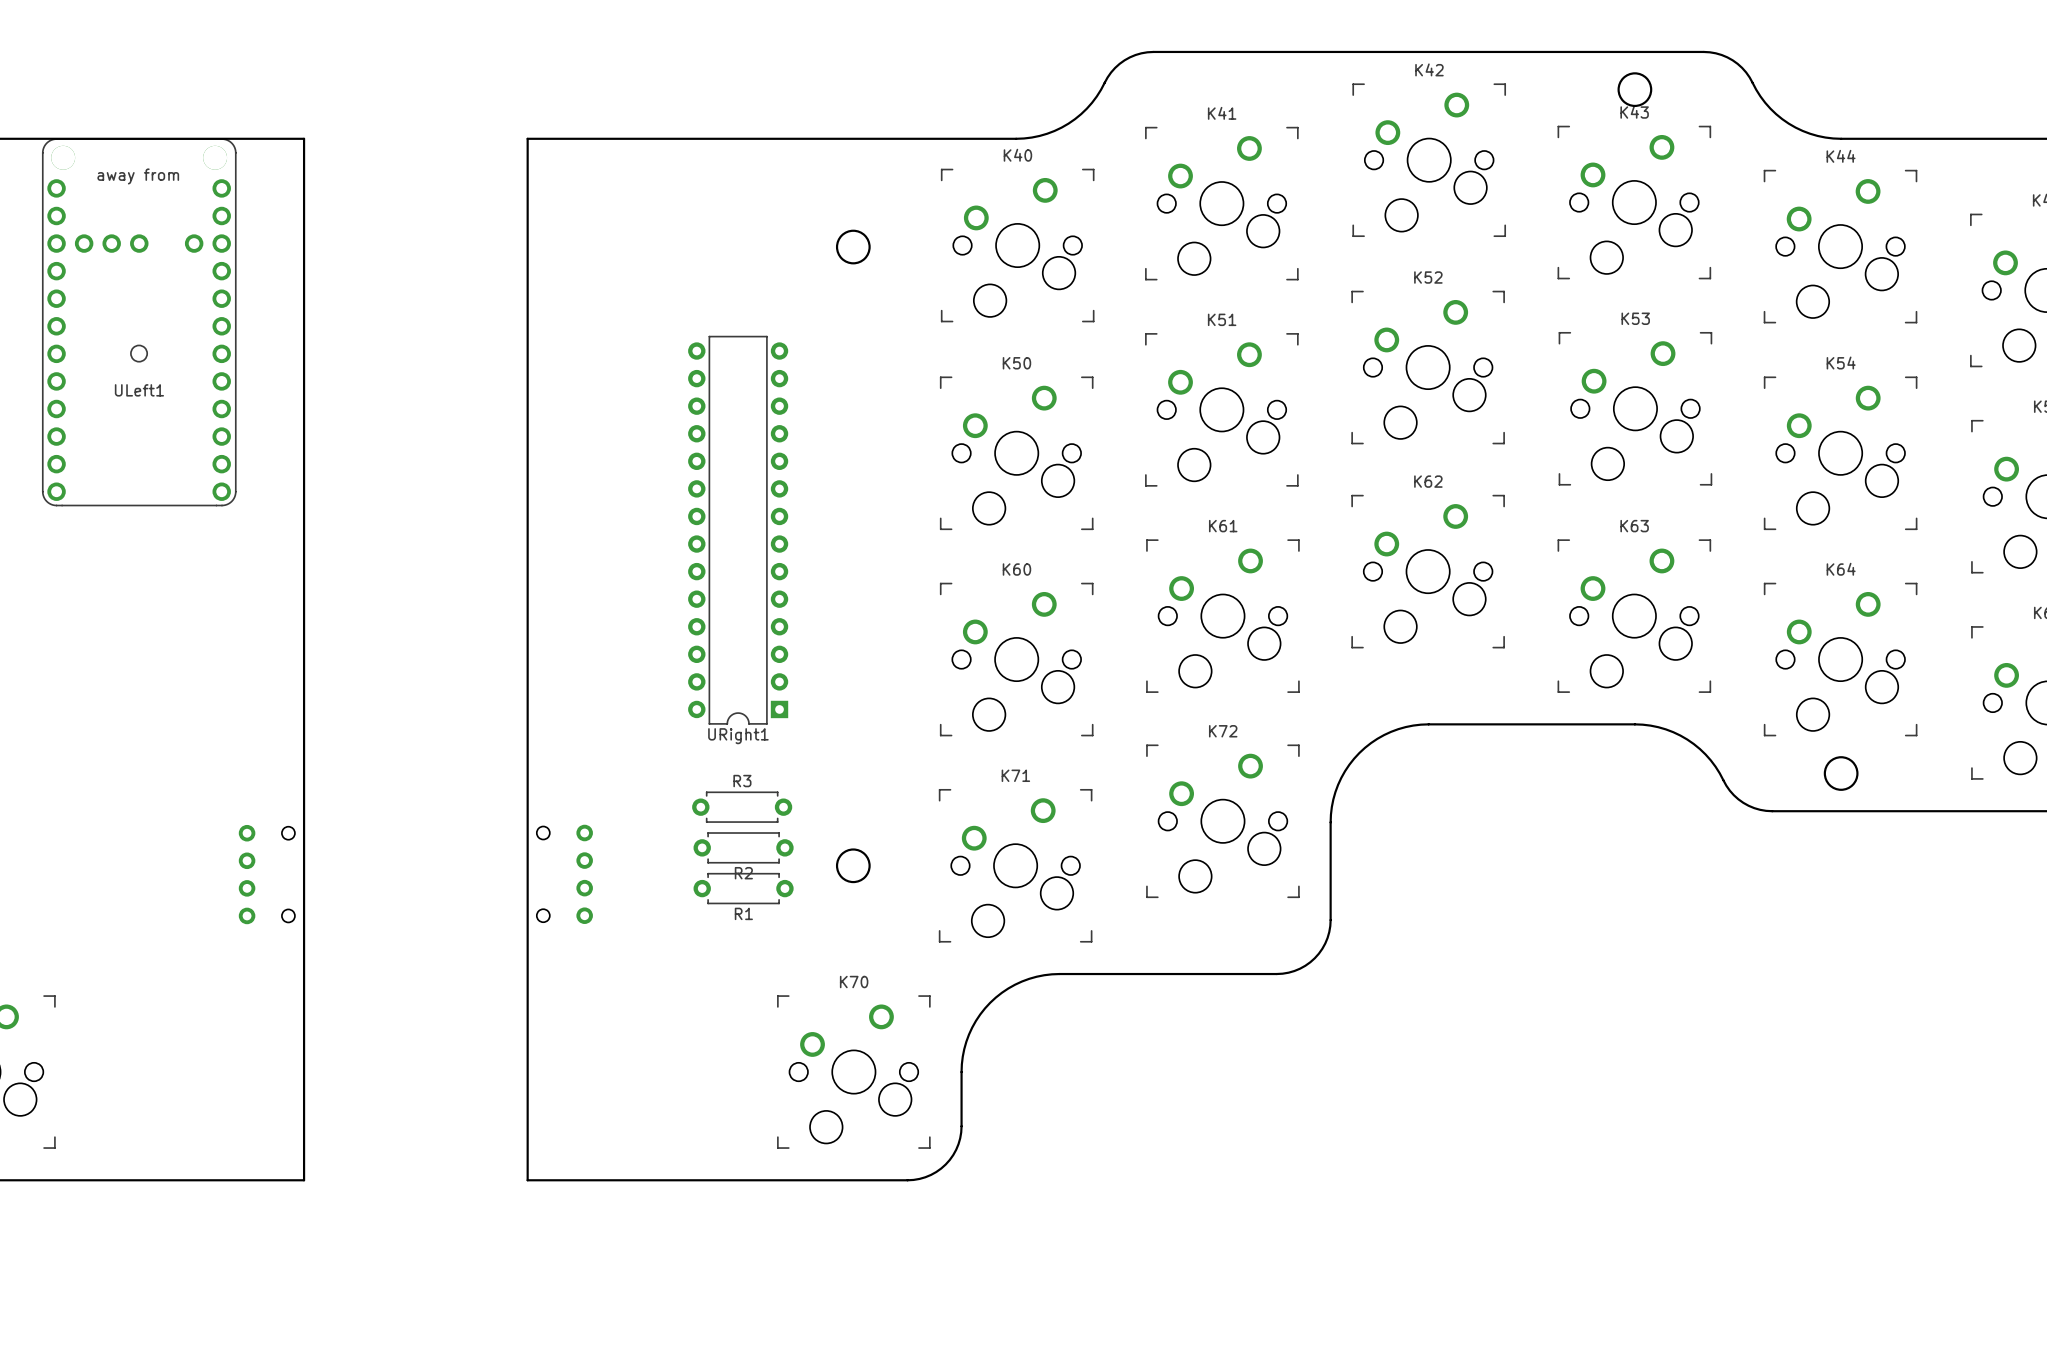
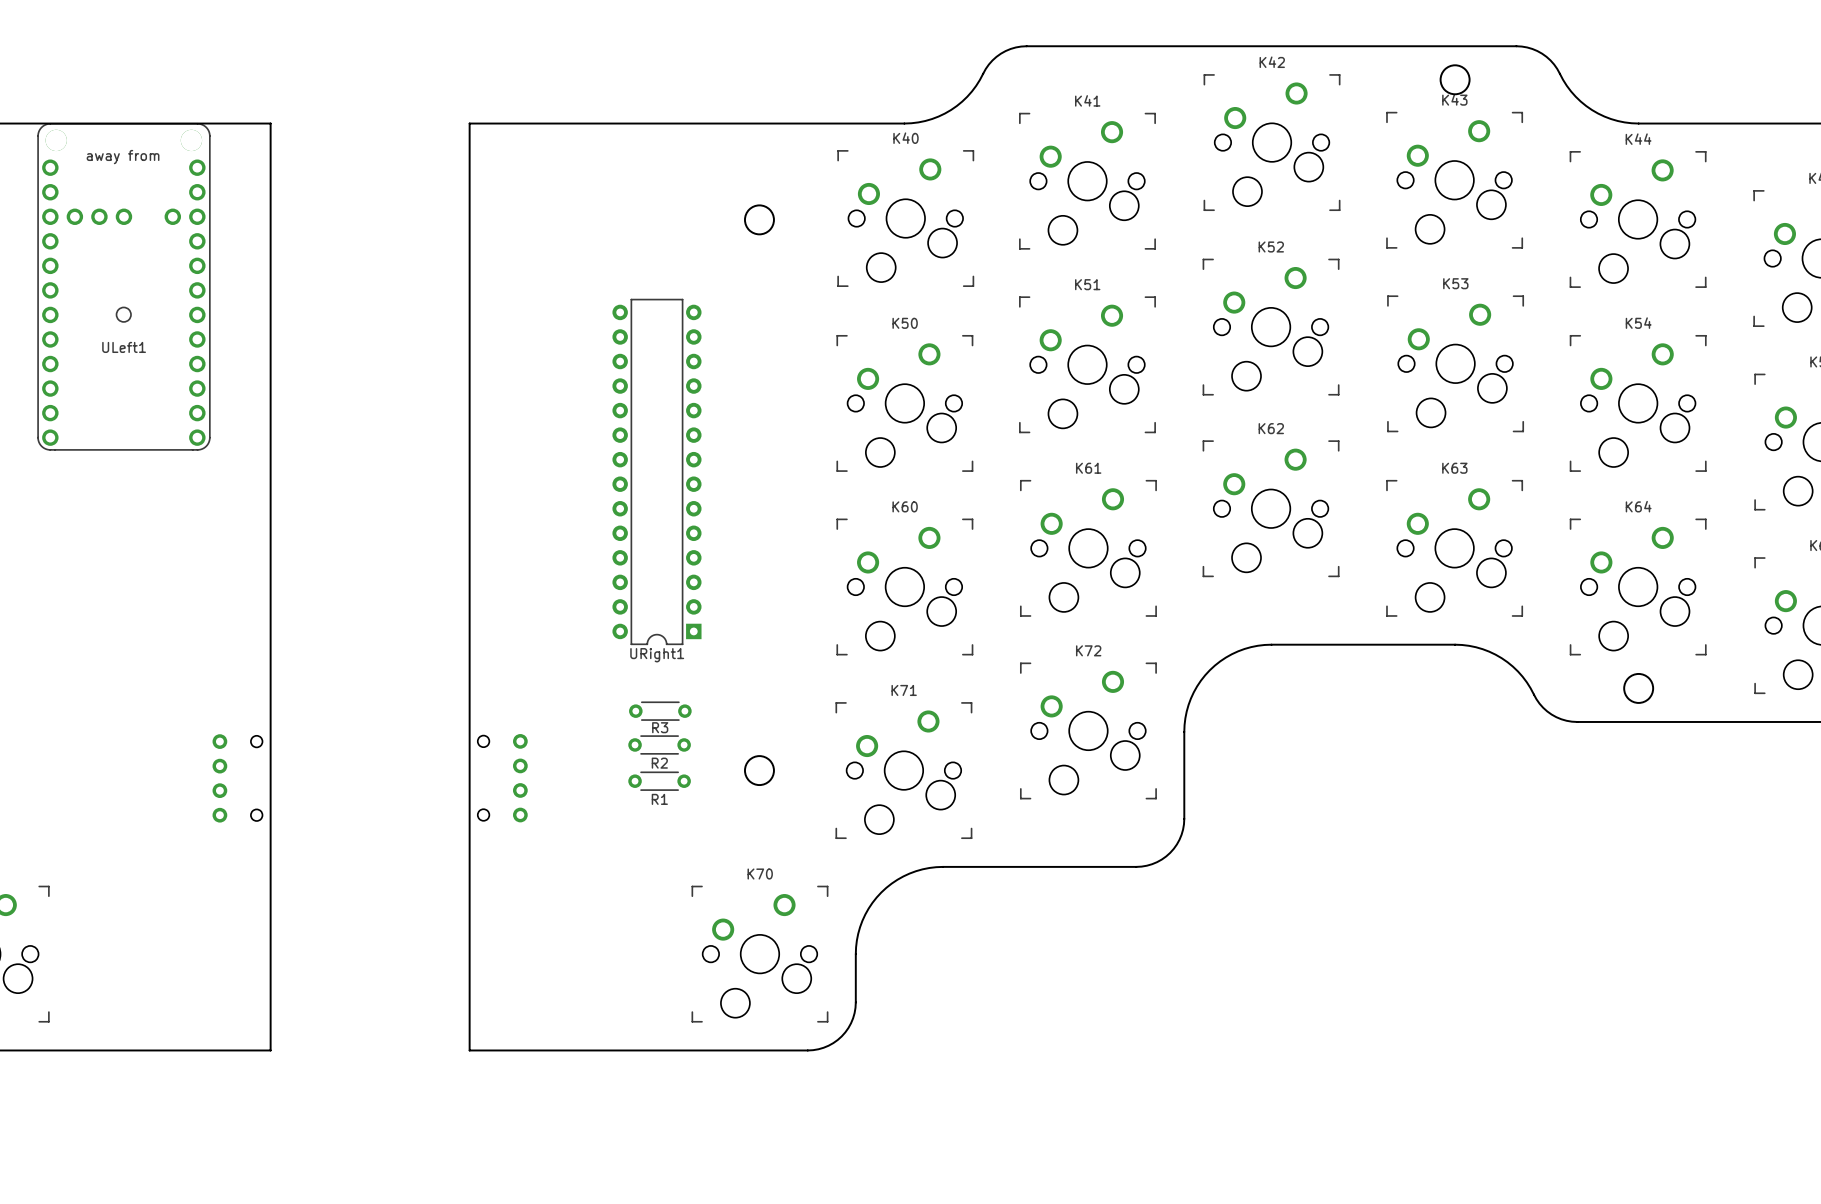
R3 name position: R3 (742, 781) -> R3 (660, 727)
R3 footprint: [692, 791, 793, 823] -> [629, 701, 692, 721]
R2 footprint: [693, 832, 794, 864] -> [628, 735, 691, 755]
R1 footprint: [693, 873, 794, 905] -> [628, 771, 691, 791]

